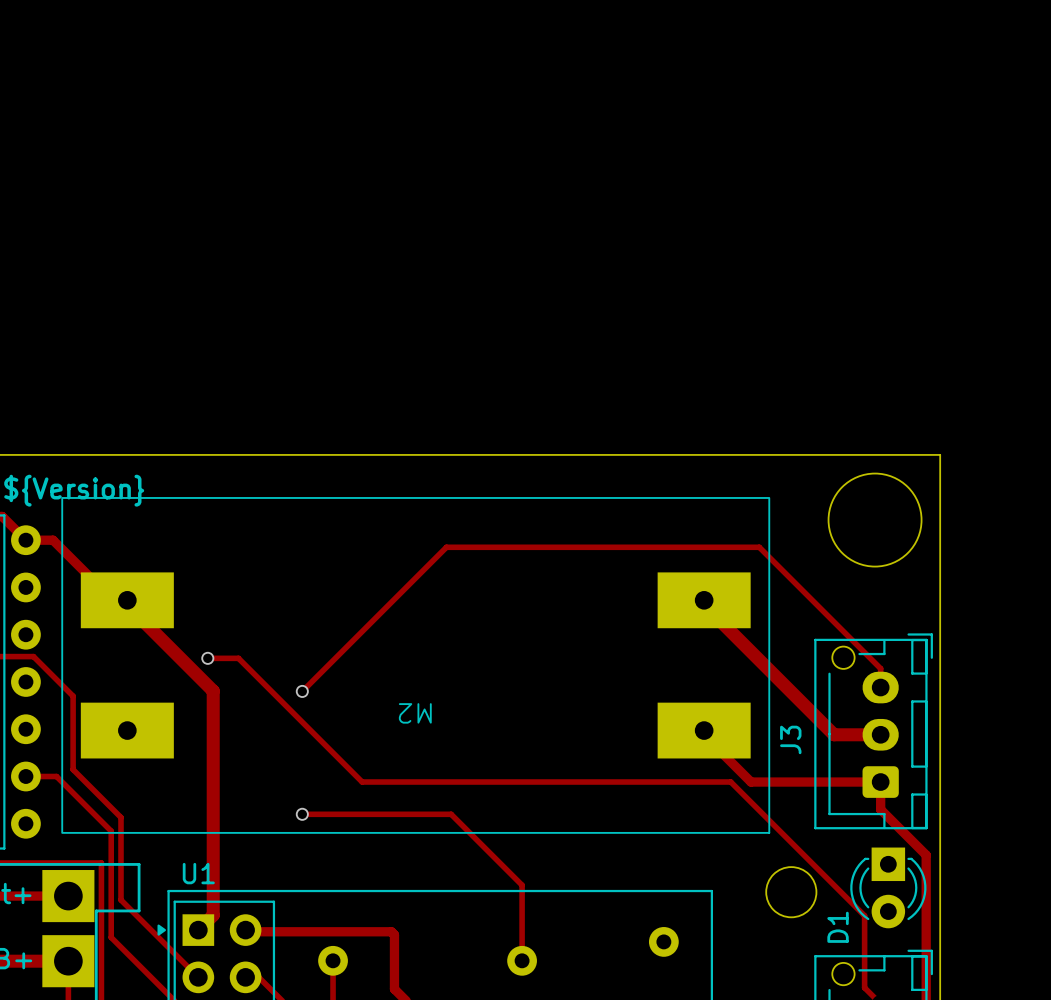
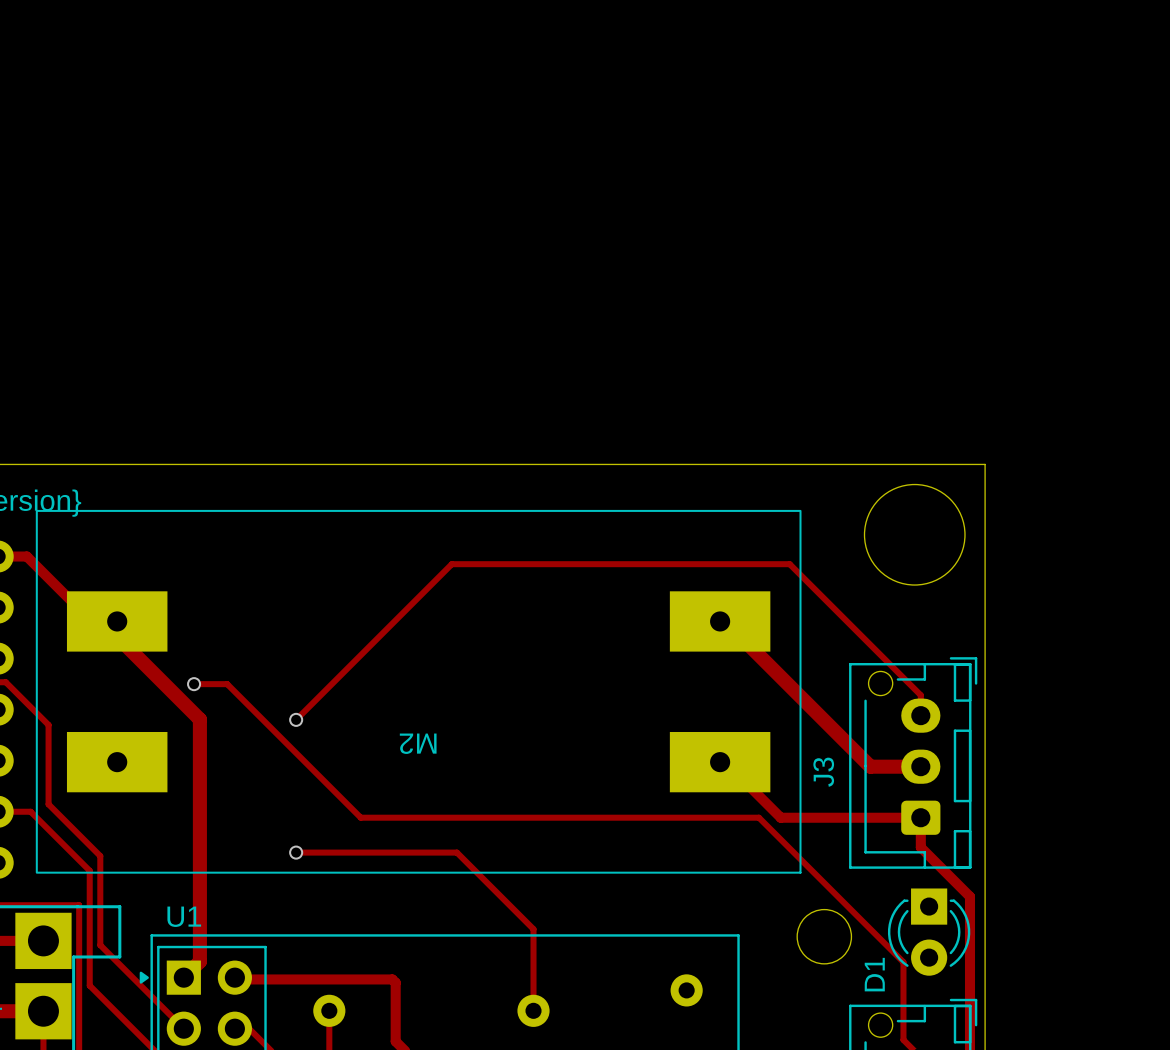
M2 footprint: [61, 497, 771, 834] -> [35, 509, 802, 874]

